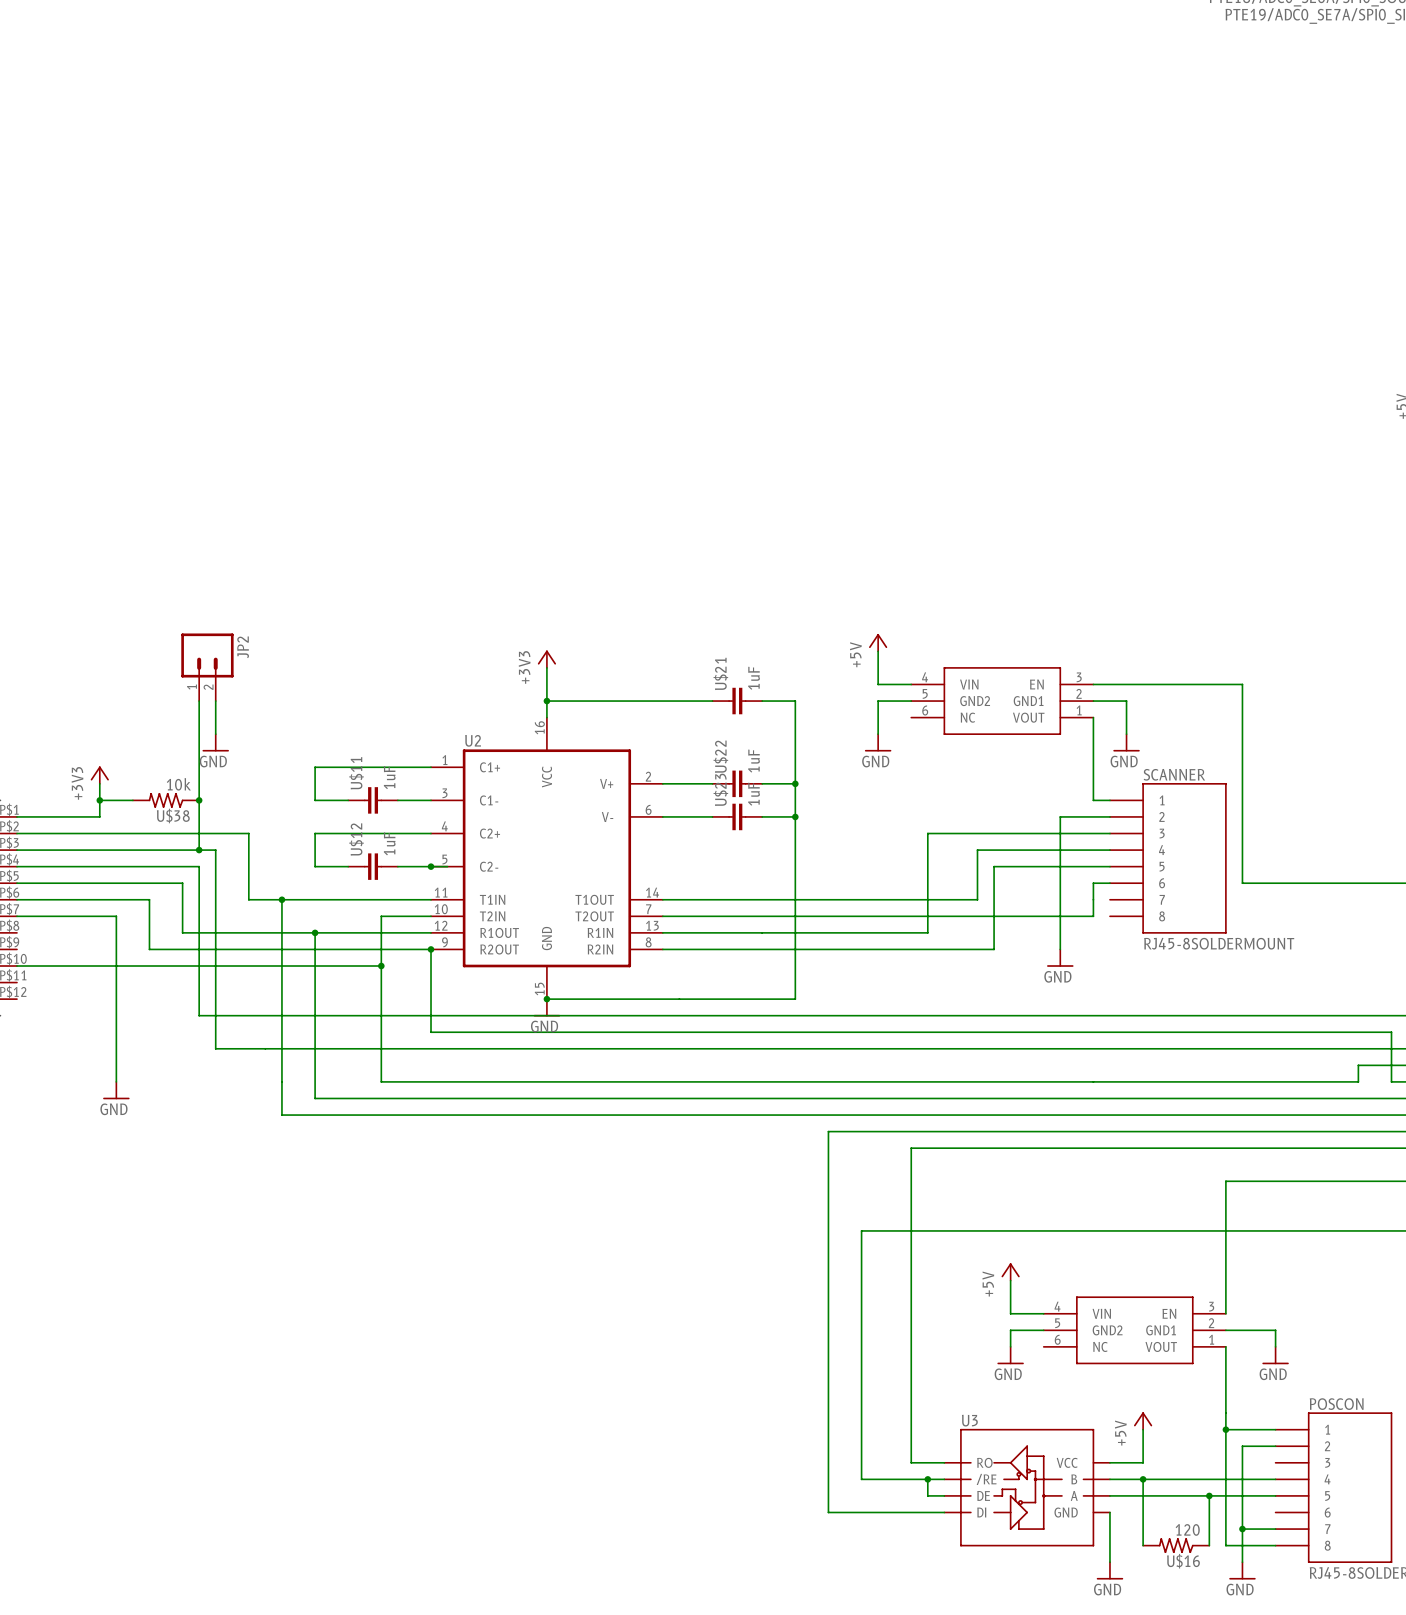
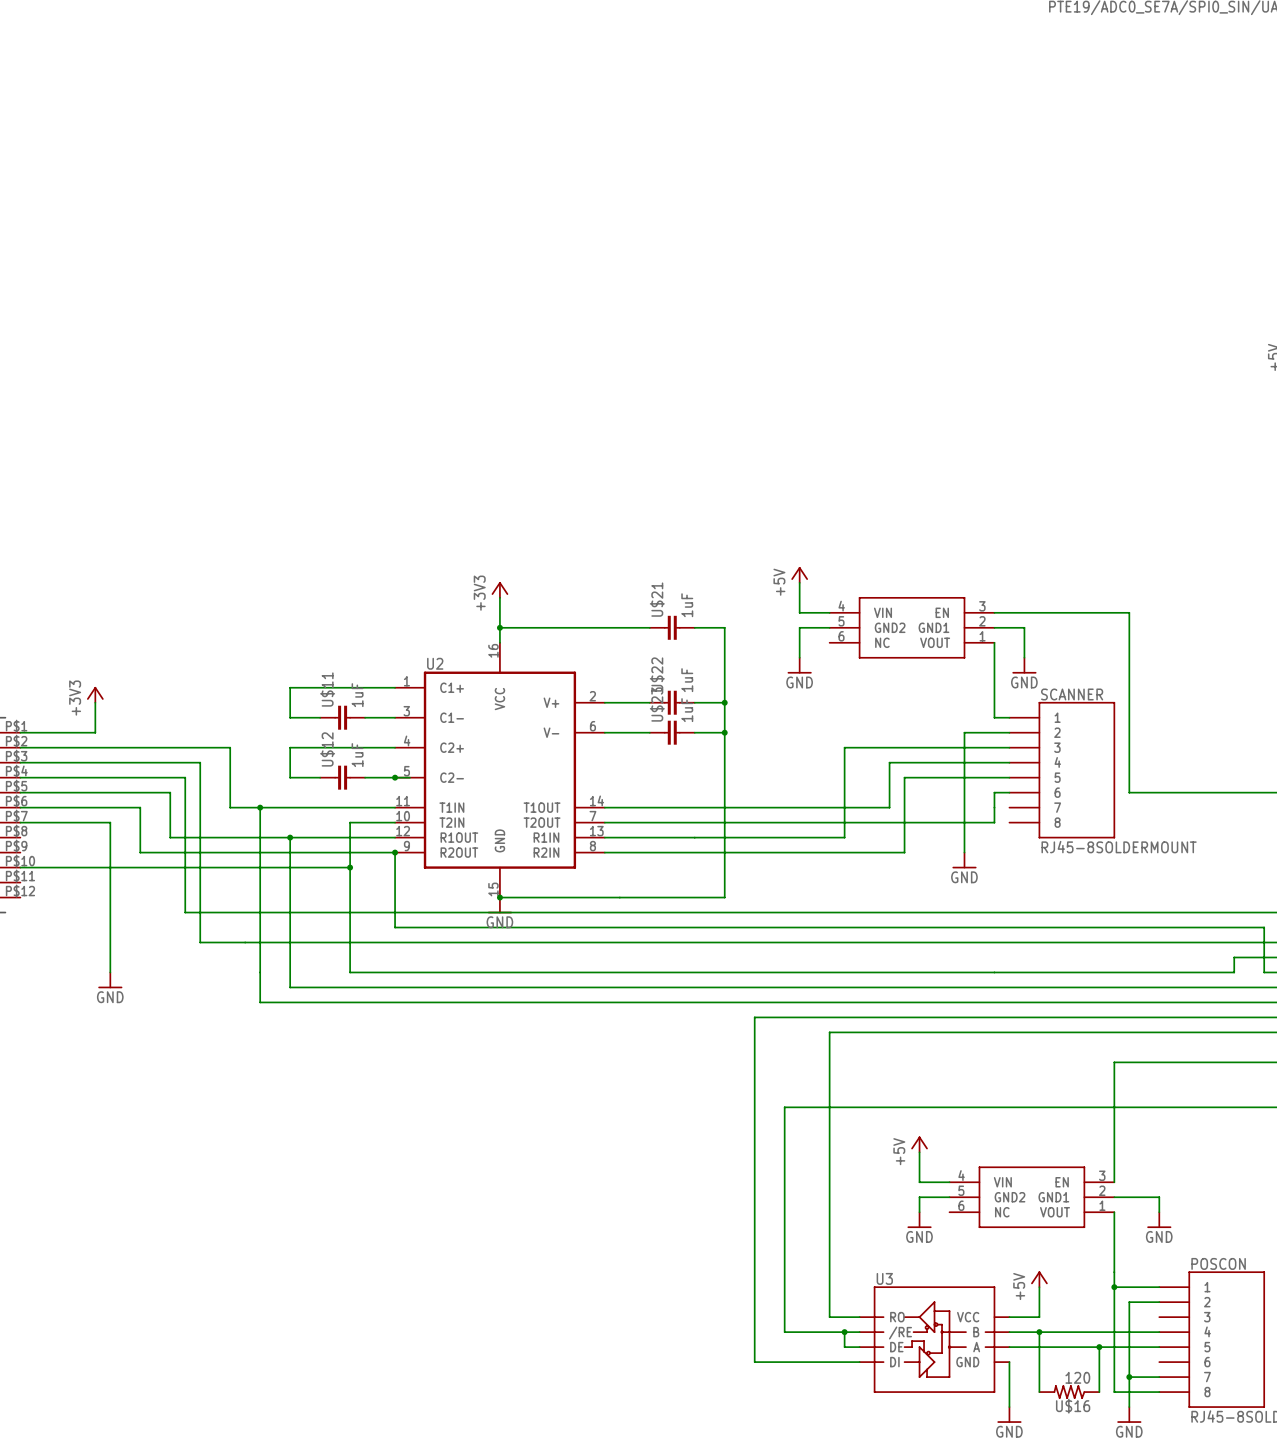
JP2: (207, 667) -> none
wire: (199, 701) (199, 850) -> none
wire: (215, 701) (215, 734) -> none
power symbol: GND (215, 742) -> none
wire: (99, 800) (132, 800) -> none
junction: (99, 800) -> none
U$38: 10k (166, 800) -> none
junction: (199, 800) -> none
junction: (199, 850) -> none

